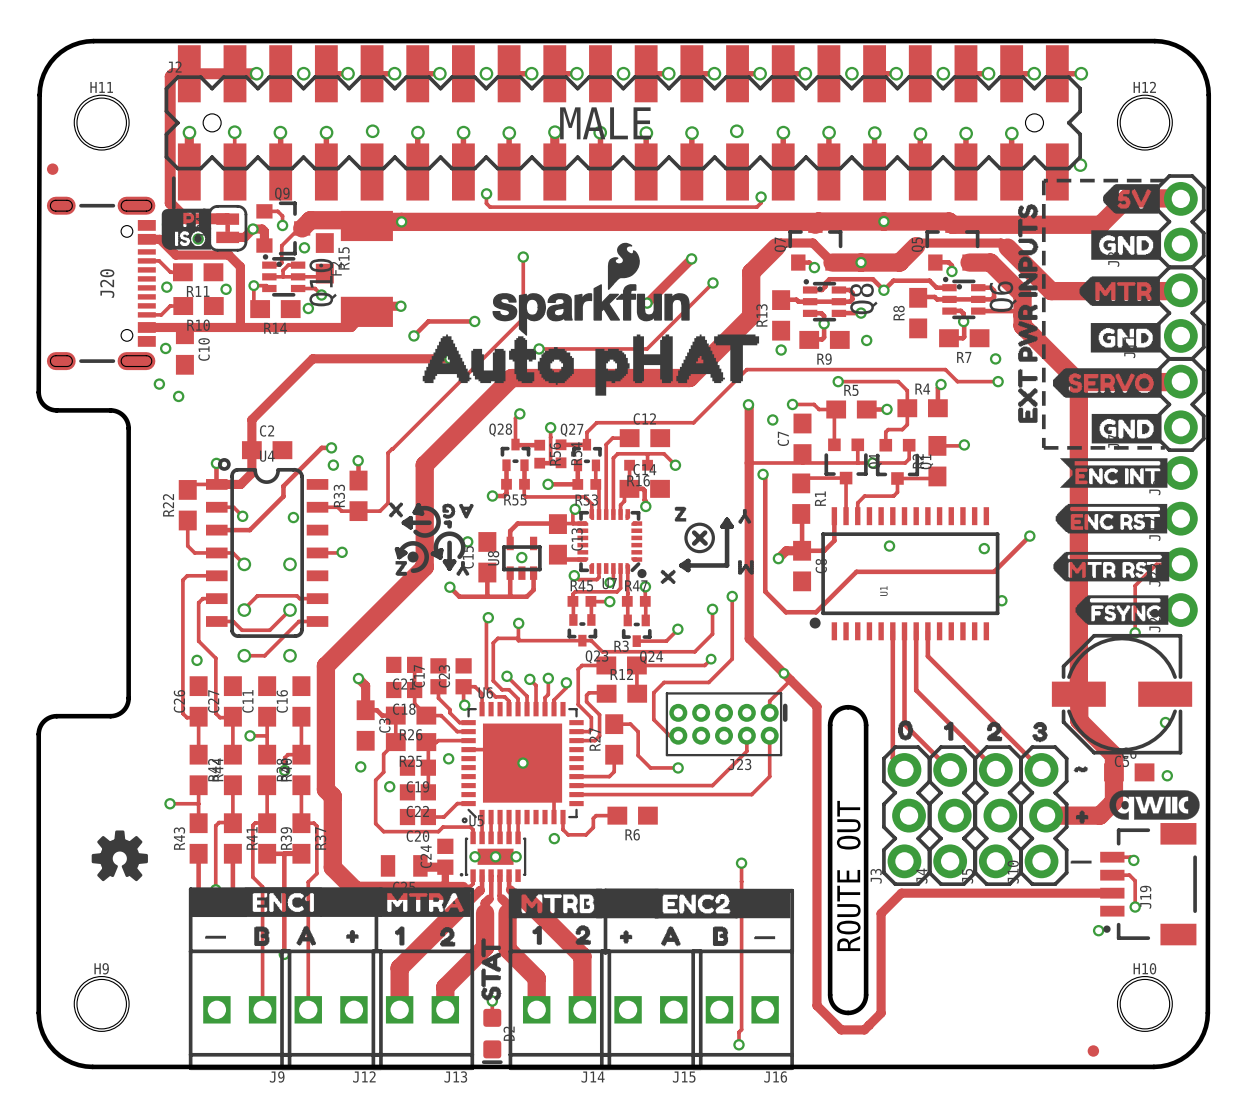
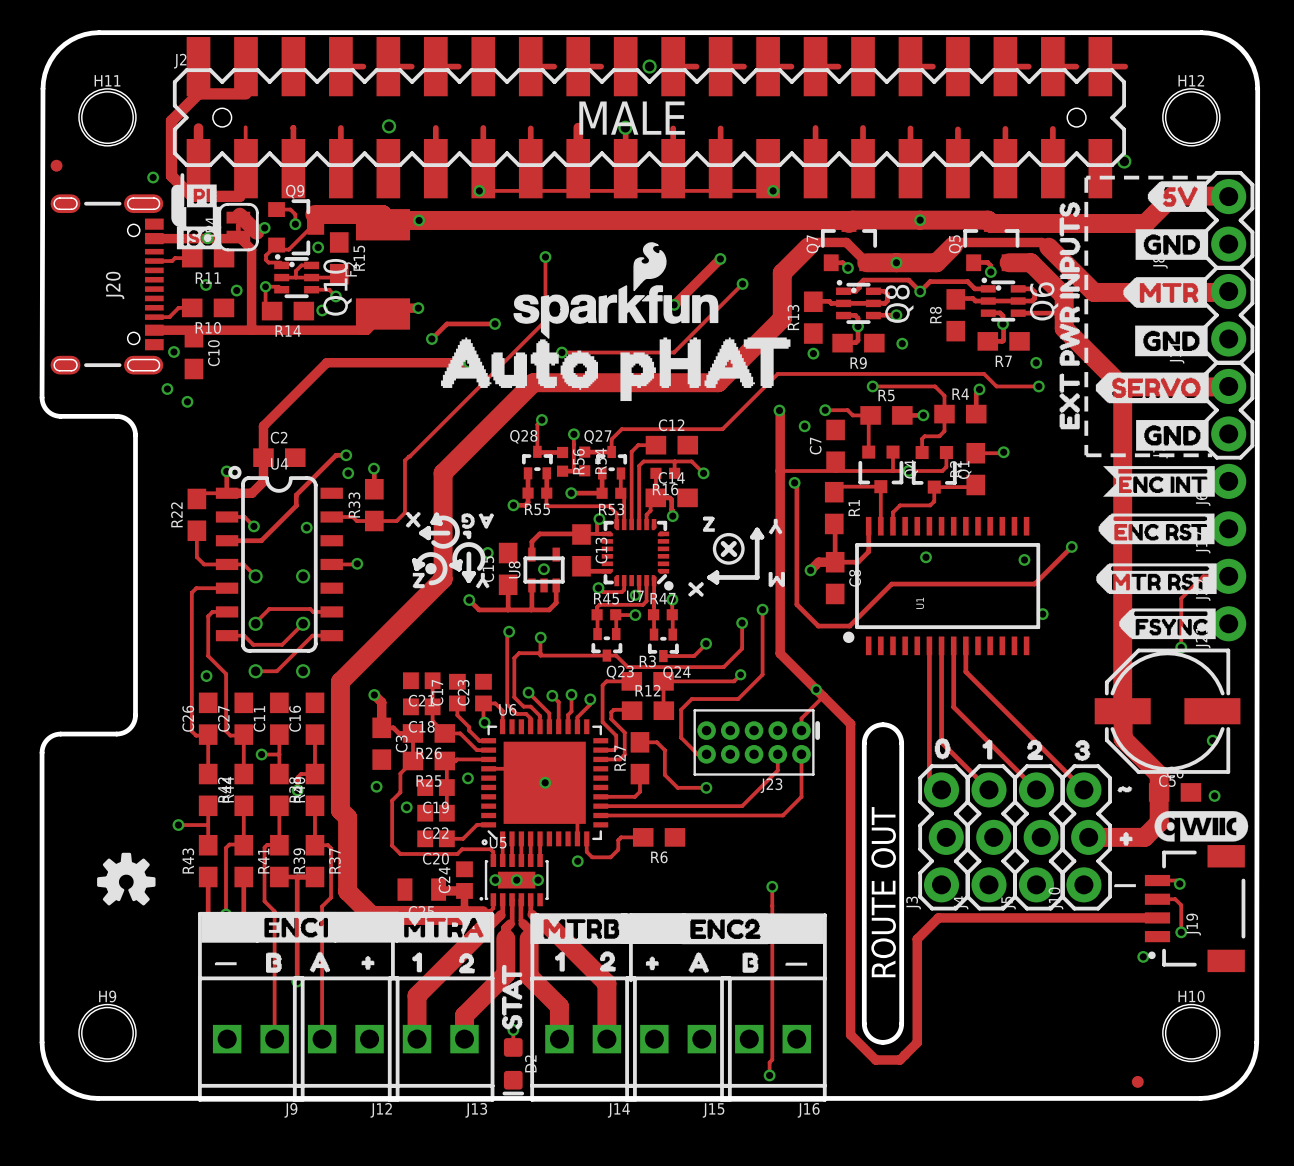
track: (256, 73) (172, 73) (170, 76) (170, 203) (185, 218) (227, 219) -> none
via: (256, 73) -> none
via: (303, 73) -> none
via: (348, 73) -> none
via: (394, 73) -> none
via: (439, 73) -> none
via: (486, 73) -> none
via: (531, 73) -> none
via: (576, 73) -> none
via: (668, 73) -> none
via: (714, 73) -> none
via: (760, 73) -> none
via: (805, 73) -> none
via: (851, 73) -> none
via: (896, 73) -> none
via: (943, 73) -> none
via: (988, 73) -> none
via: (1034, 73) -> none
via: (1081, 73) -> none
track: none -> (245, 93) (198, 93) (171, 120) (171, 175) (191, 196) (239, 196)
via: (736, 131) -> none
via: (189, 132) -> none
via: (234, 132) -> none
via: (280, 132) -> none
via: (326, 132) -> none
via: (417, 132) -> none
via: (463, 132) -> none
via: (554, 132) -> none
via: (783, 132) -> none
via: (829, 132) -> none
via: (509, 133) -> none
via: (646, 133) -> none
via: (692, 133) -> none
via: (874, 133) -> none
via: (966, 133) -> none
via: (1011, 133) -> none
via: (920, 134) -> none
via: none -> (153, 177)
track: none -> (479, 190) (773, 190)
via position: (486, 193) -> (479, 190)
track: (486, 194) (486, 203) (490, 207) (756, 207) (761, 202) (761, 197) -> none
via position: (761, 197) -> (773, 190)
track: none -> (239, 215) (256, 232)
drawing position: (191, 219) -> (201, 195)
track: (370, 221) (366, 225) (361, 220) (310, 220) (281, 245) (281, 262) (279, 265) (269, 265) -> (387, 220) (382, 220) (382, 214) (314, 214) (308, 220) (308, 229) (288, 249) (271, 249) (266, 255) (266, 260) (268, 262) (280, 262)
drawing position: (167, 229) -> (176, 206)
track: (227, 237) (244, 237) (252, 229) (262, 229) (264, 231) (264, 245) -> none
track: (160, 239) (175, 255) (228, 255) (240, 266) -> (168, 238) (240, 238) (251, 249) (251, 267)
track: (159, 260) (170, 272) (182, 272) -> (167, 261) (172, 261) (175, 258) (192, 258)
R11 position: (198, 272) -> (208, 258)
via position: (166, 287) -> (206, 284)

